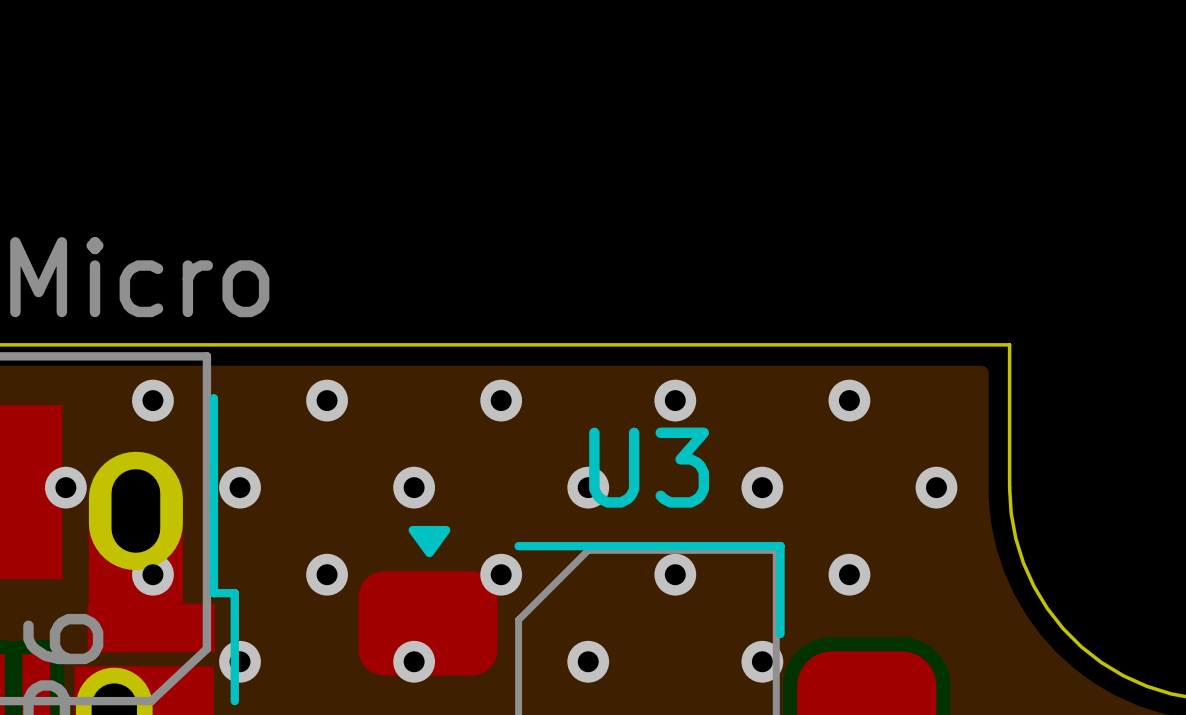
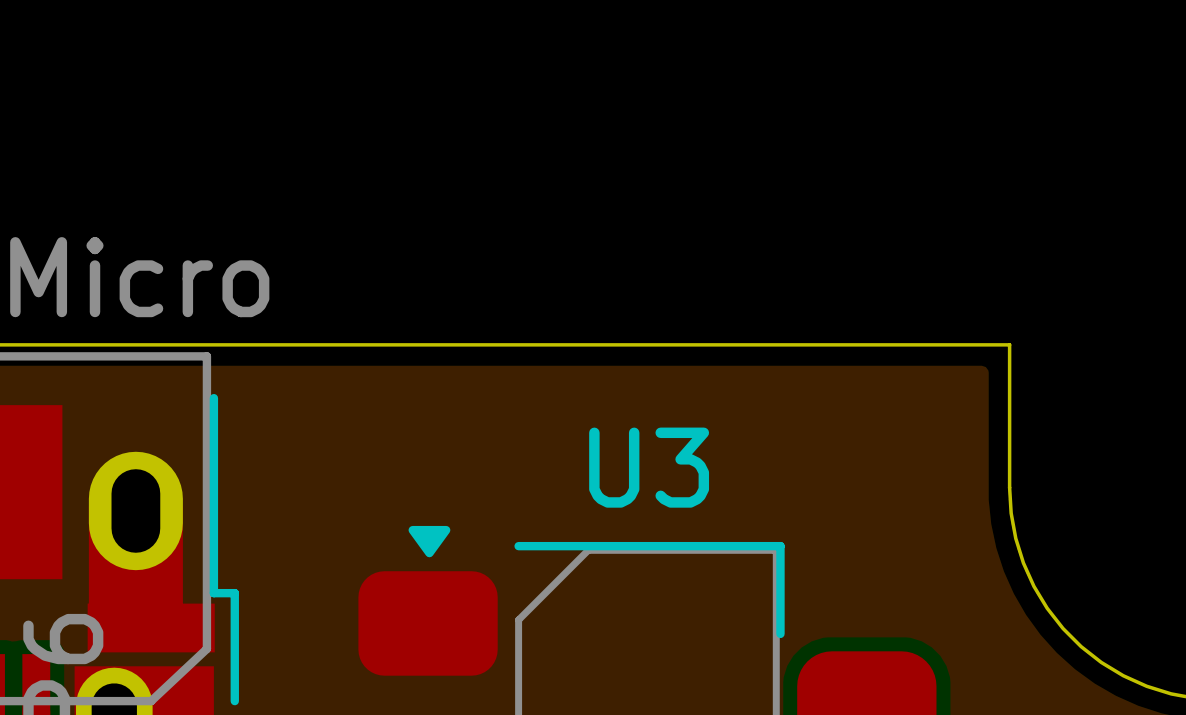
via: (152, 400) -> none
via: (327, 400) -> none
via: (501, 400) -> none
via: (675, 400) -> none
via: (849, 400) -> none
via: (65, 487) -> none
via: (240, 487) -> none
via: (414, 487) -> none
via: (588, 487) -> none
via: (762, 487) -> none
via: (936, 487) -> none
via: (152, 574) -> none
via: (327, 574) -> none
via: (501, 574) -> none
via: (675, 574) -> none
via: (849, 574) -> none
via: (240, 661) -> none
via: (414, 661) -> none
via: (588, 661) -> none
via: (762, 661) -> none

